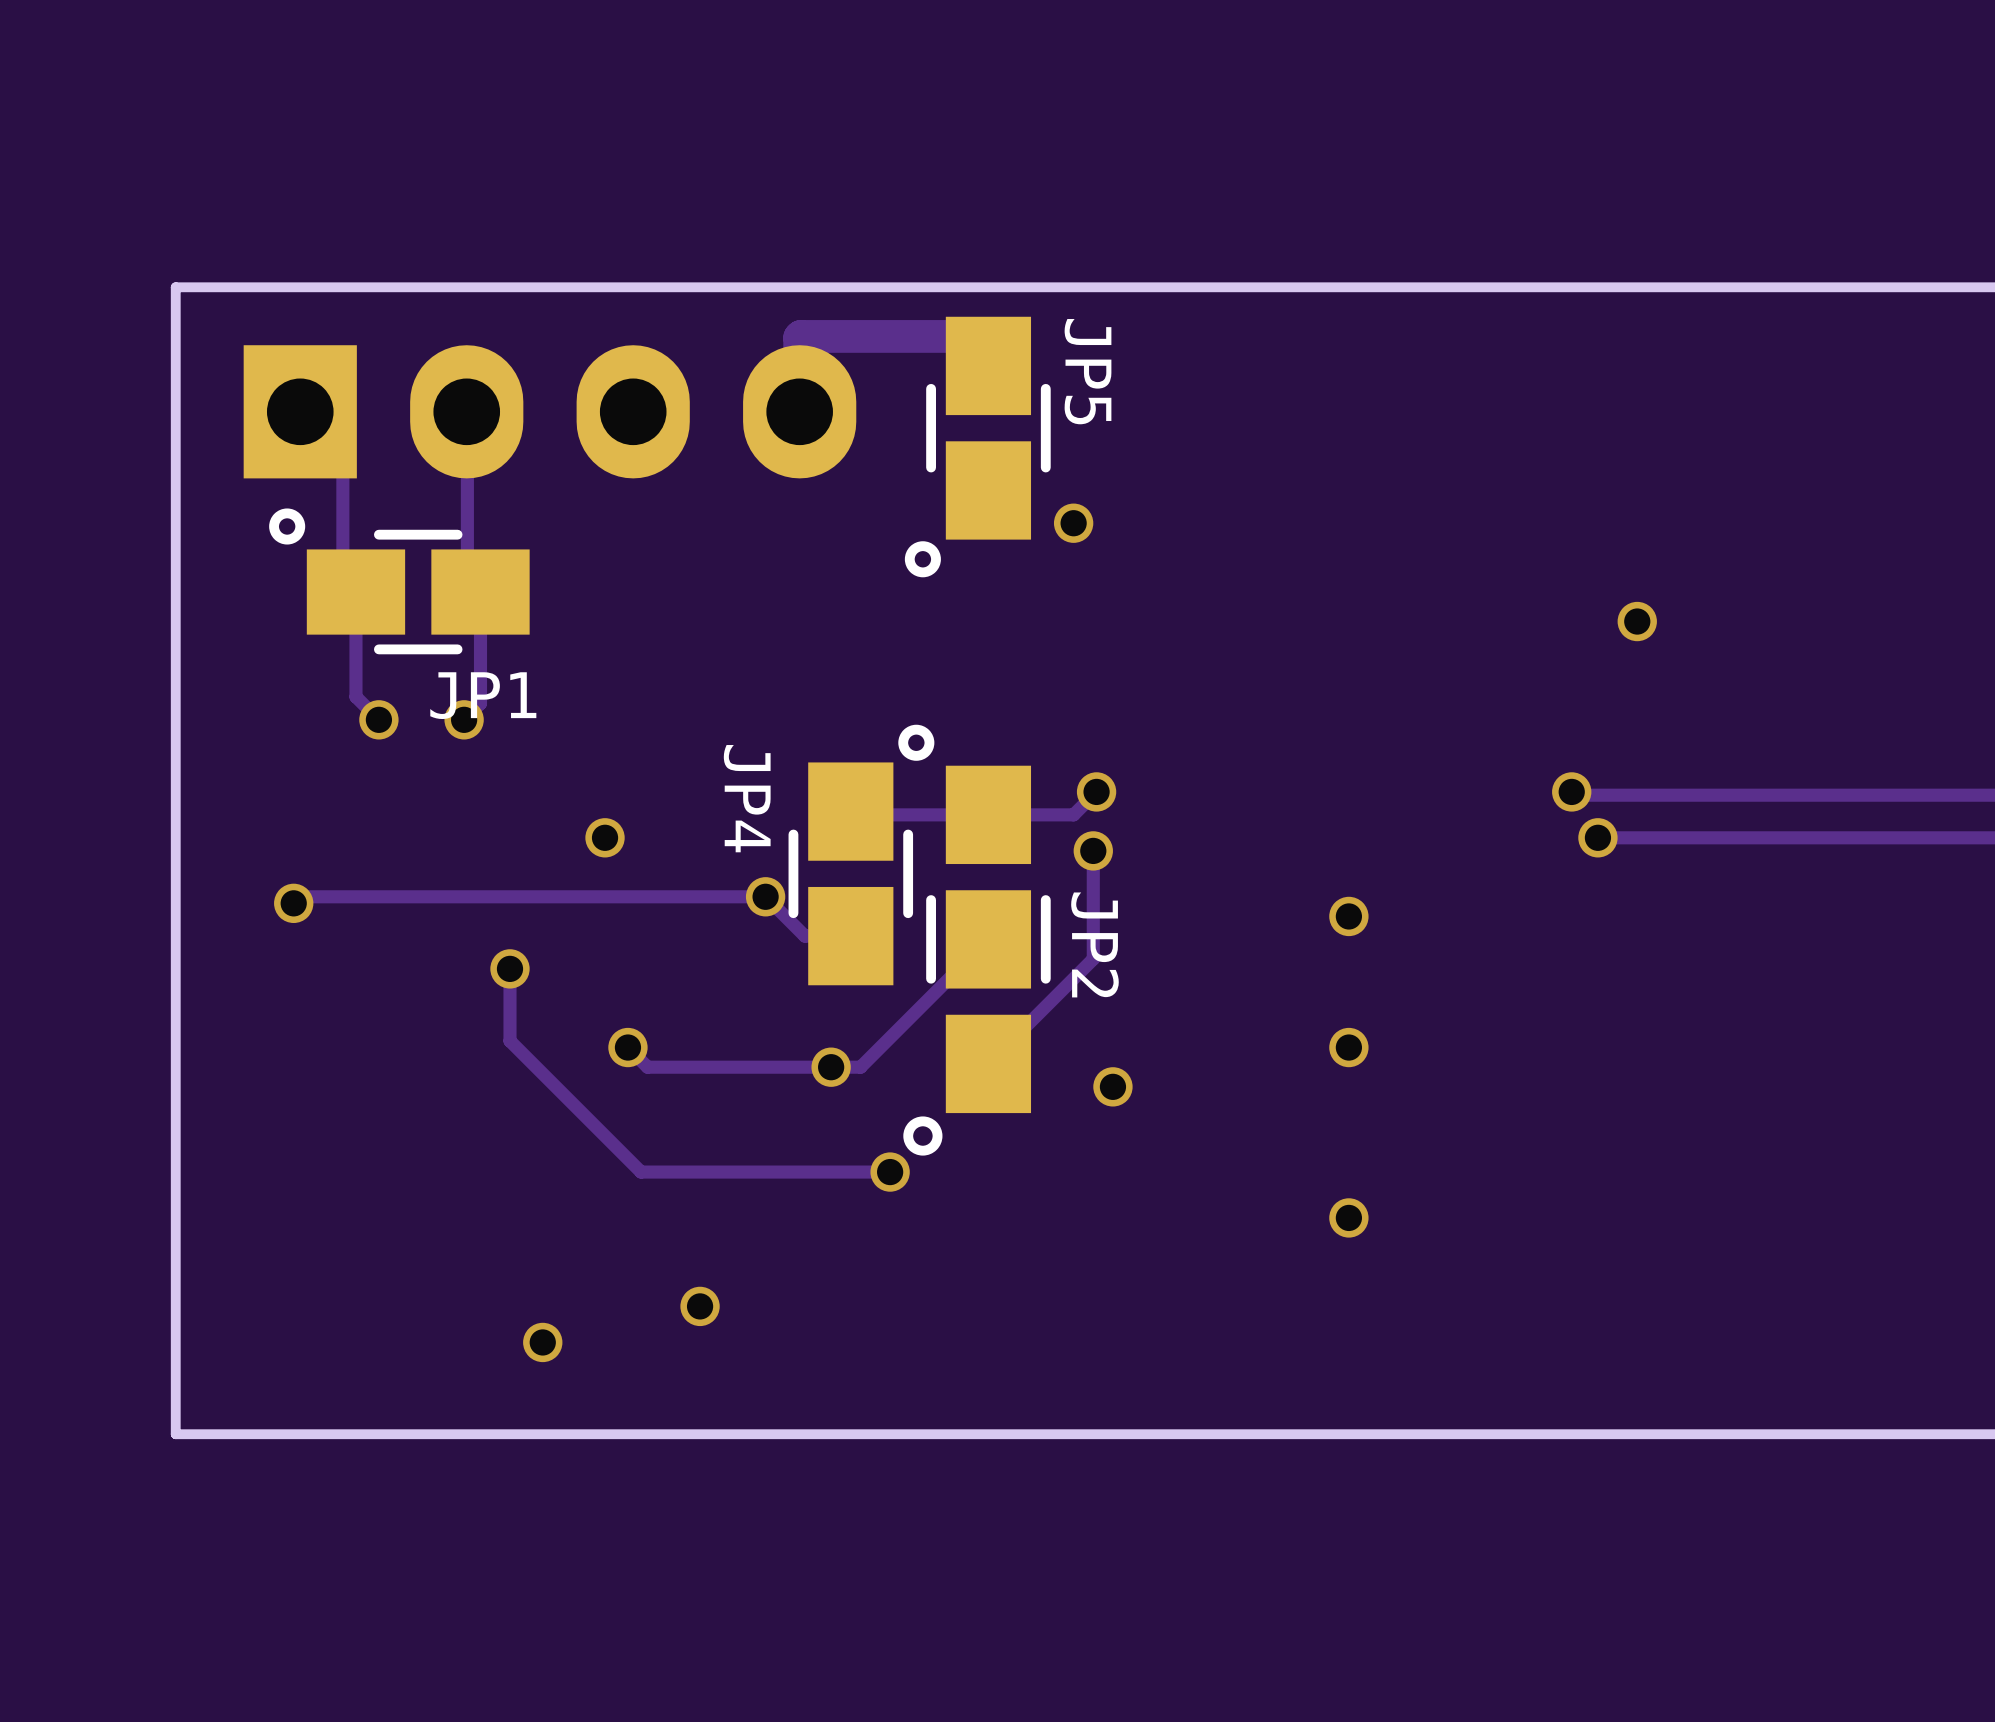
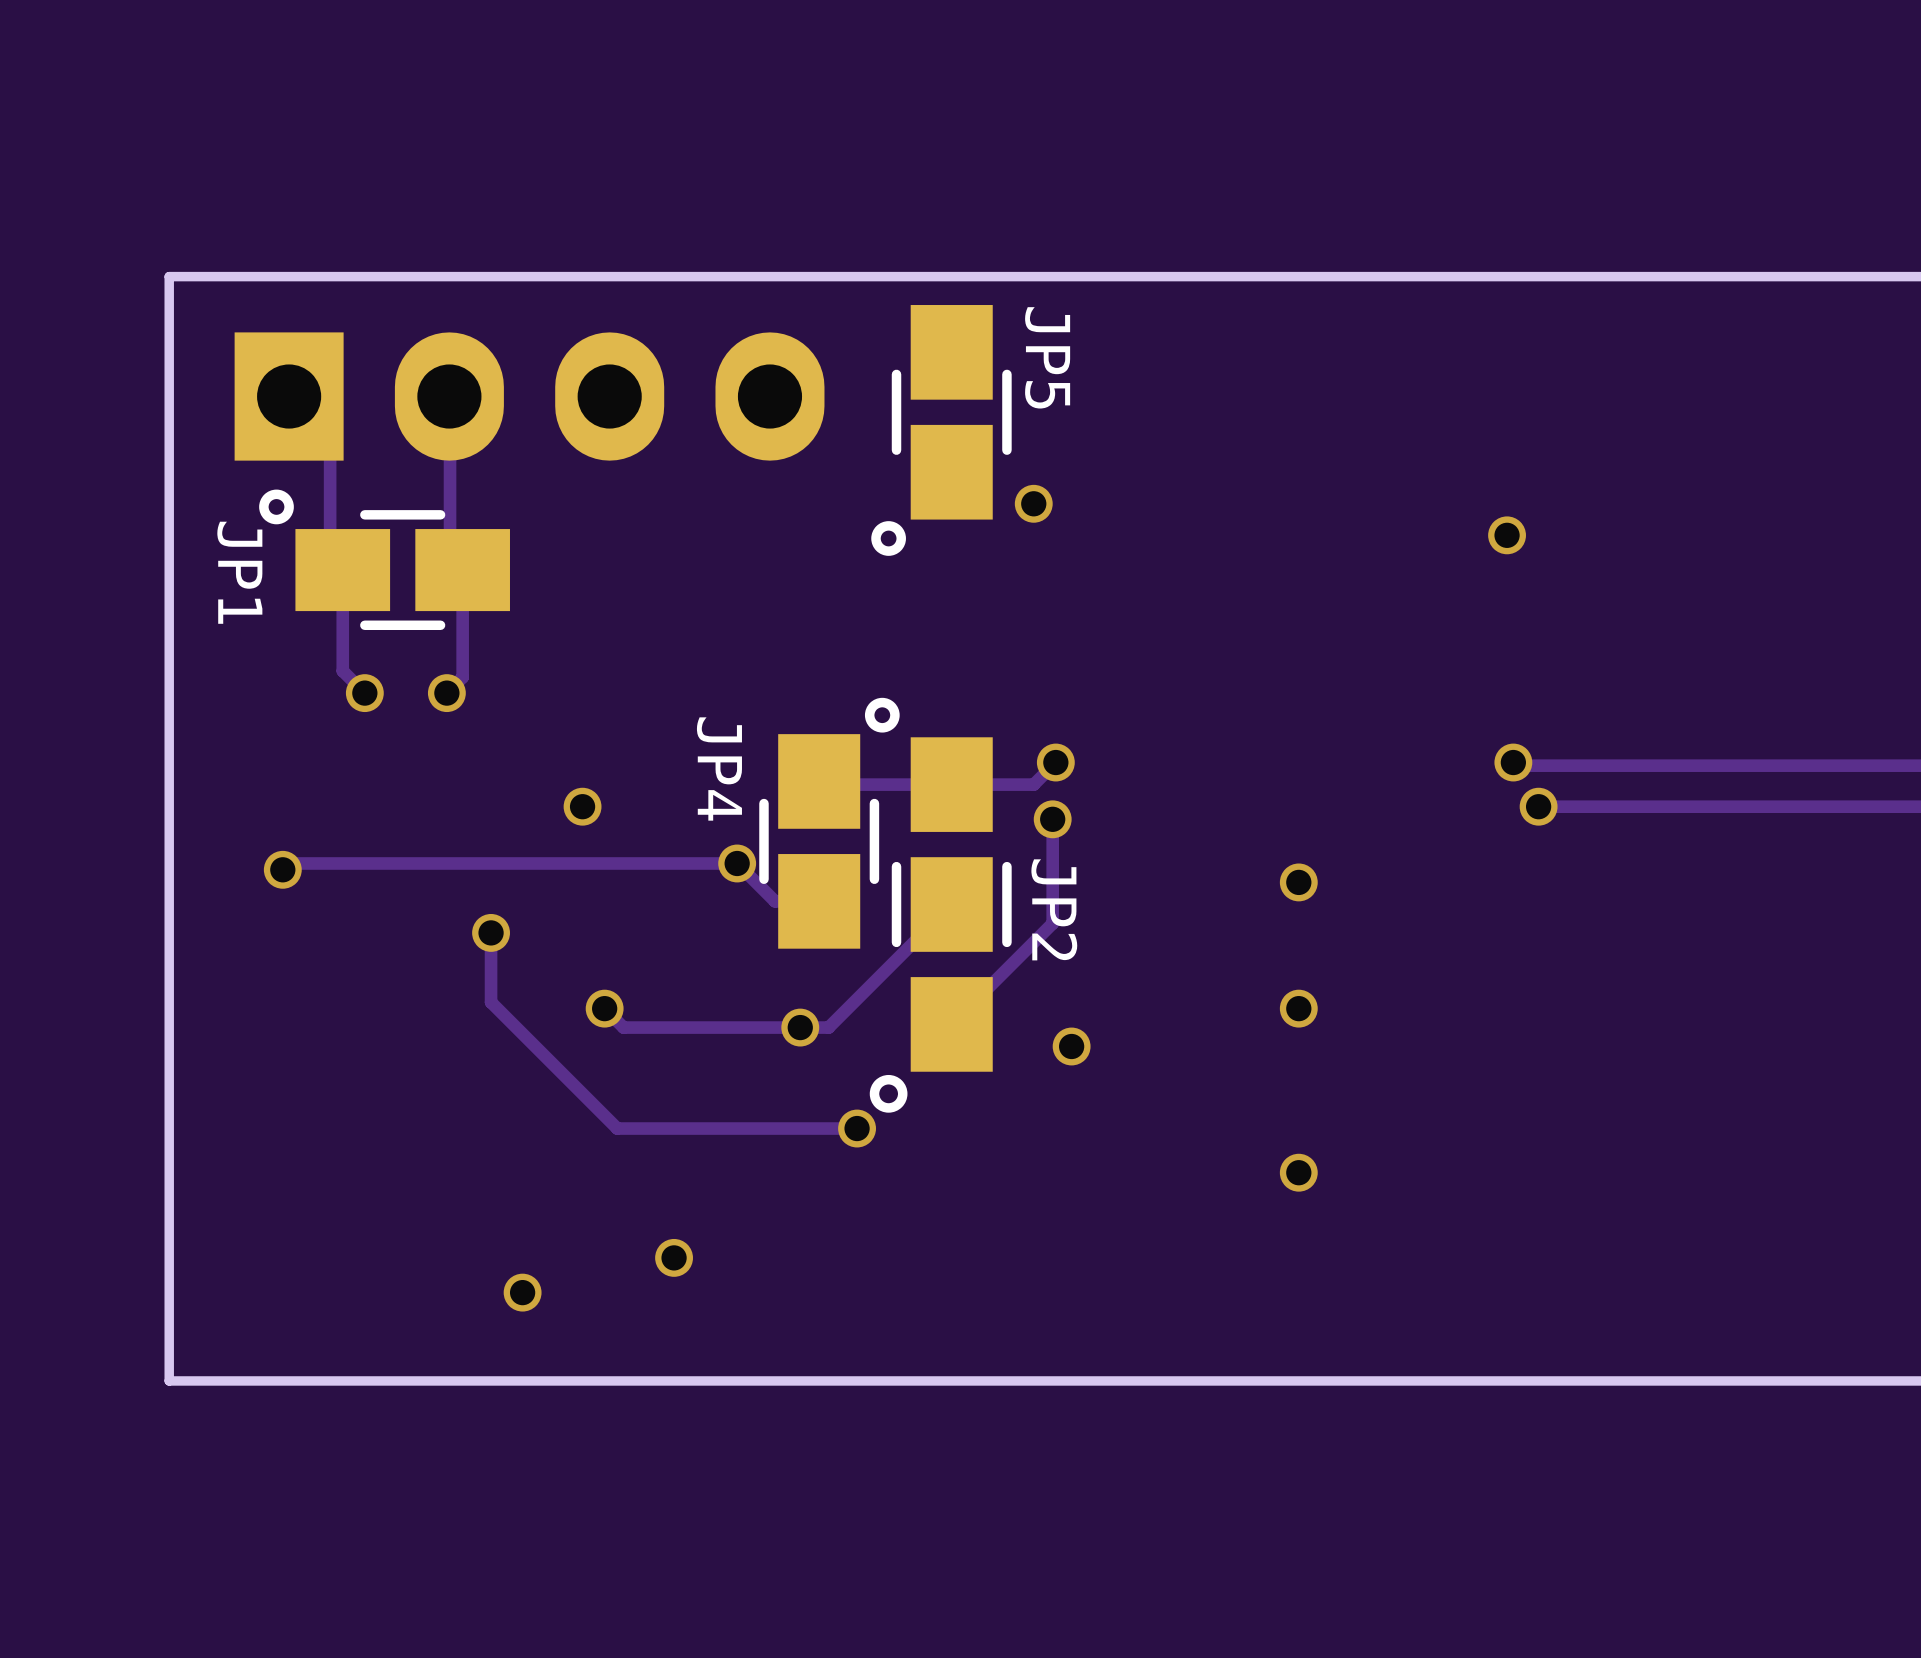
track: (988, 365) (958, 336) (800, 336) (799, 411) -> none
via position: (1637, 621) -> (1507, 535)
JP1 name rotation: 0° (483, 695) -> 90° clockwise (239, 572)
JP1 name position: JP1 (483, 695) -> JP1 (239, 572)

